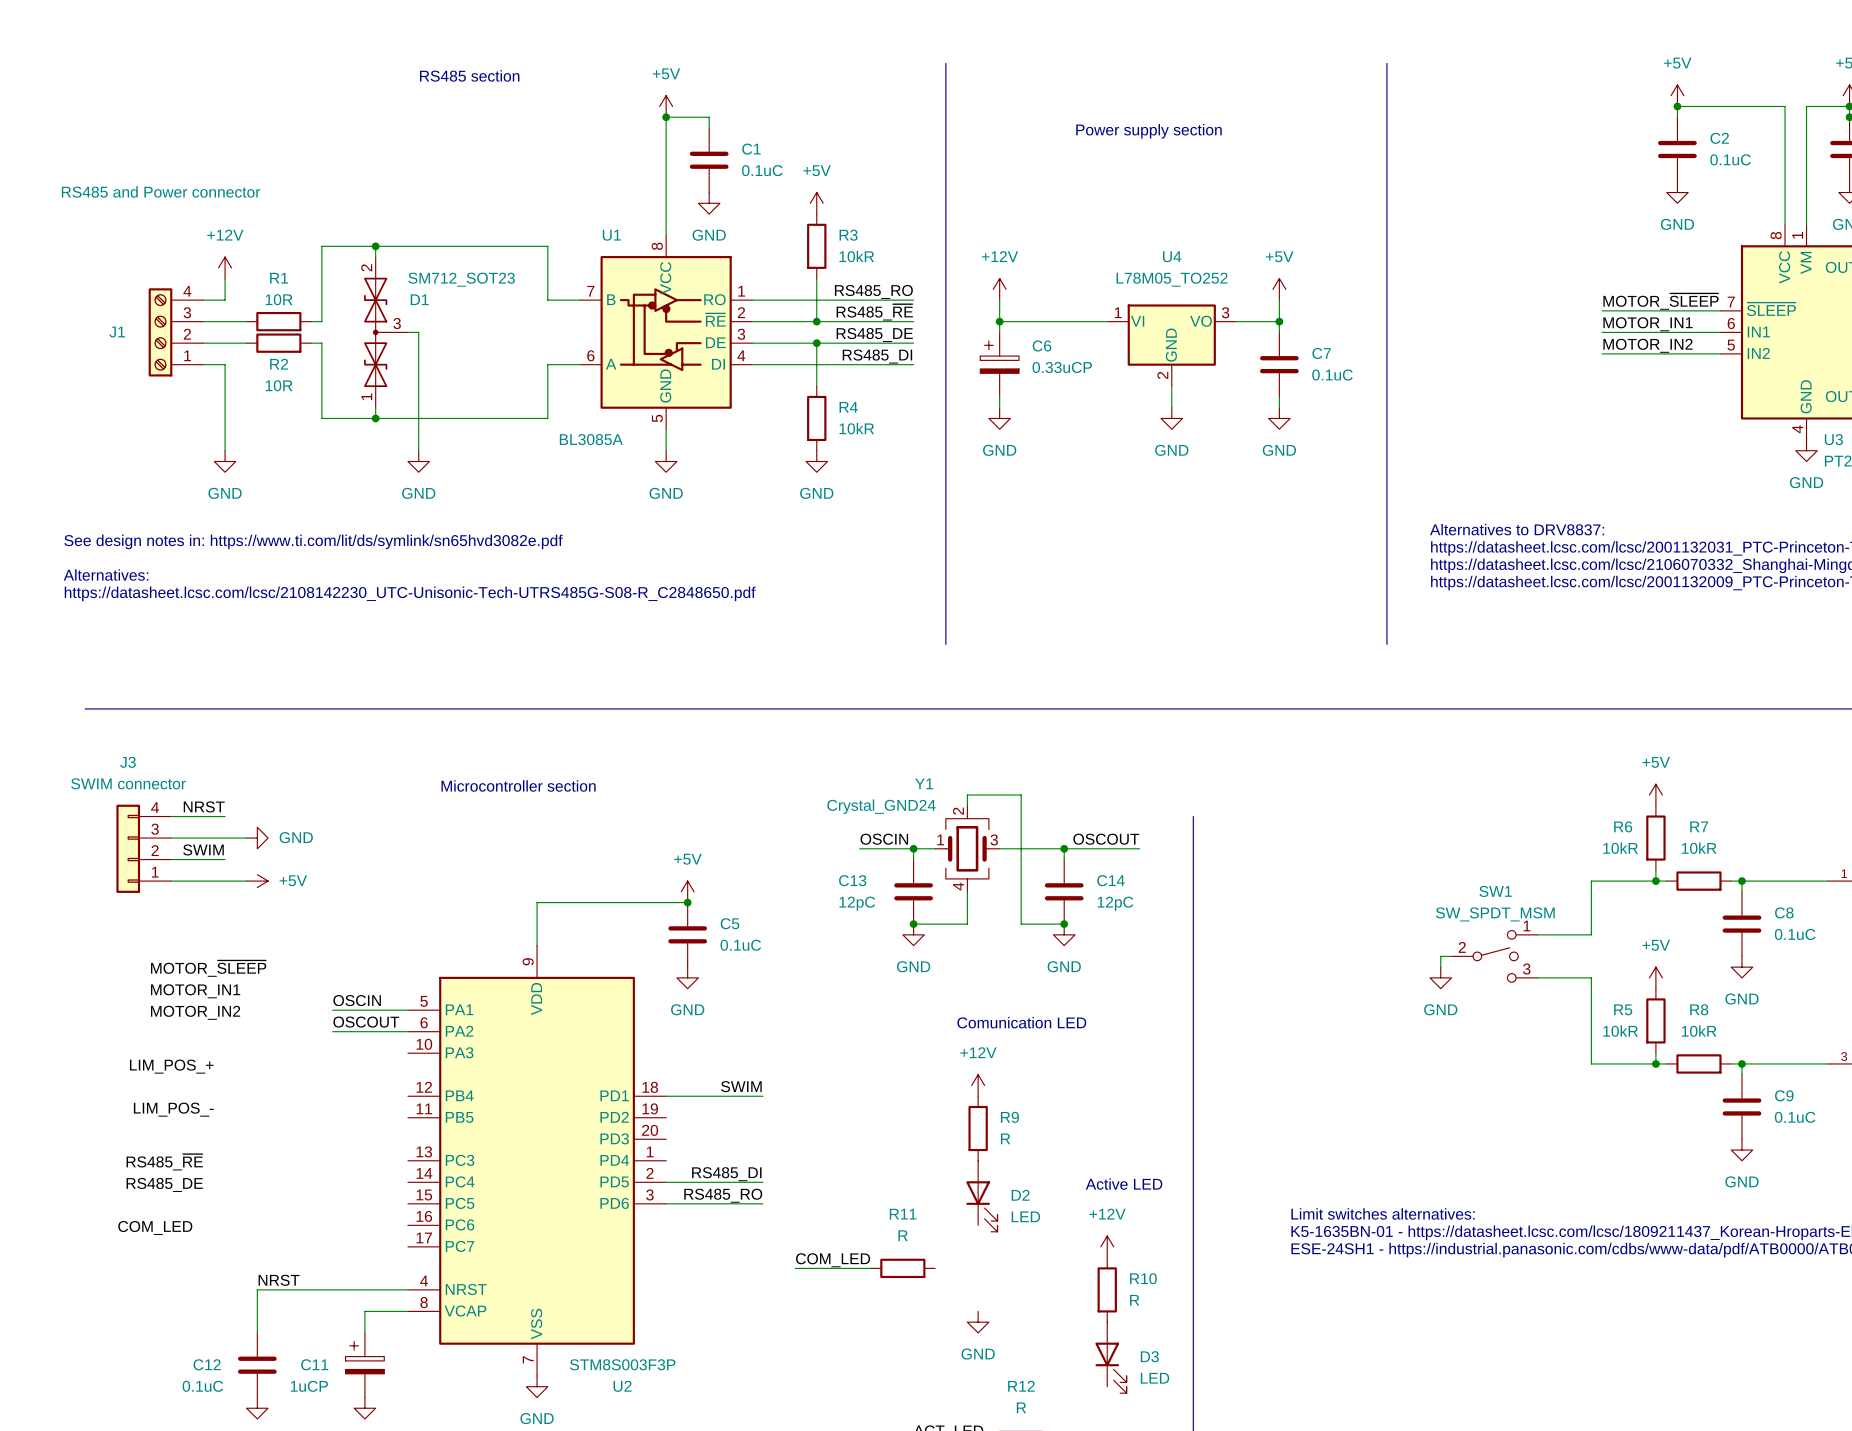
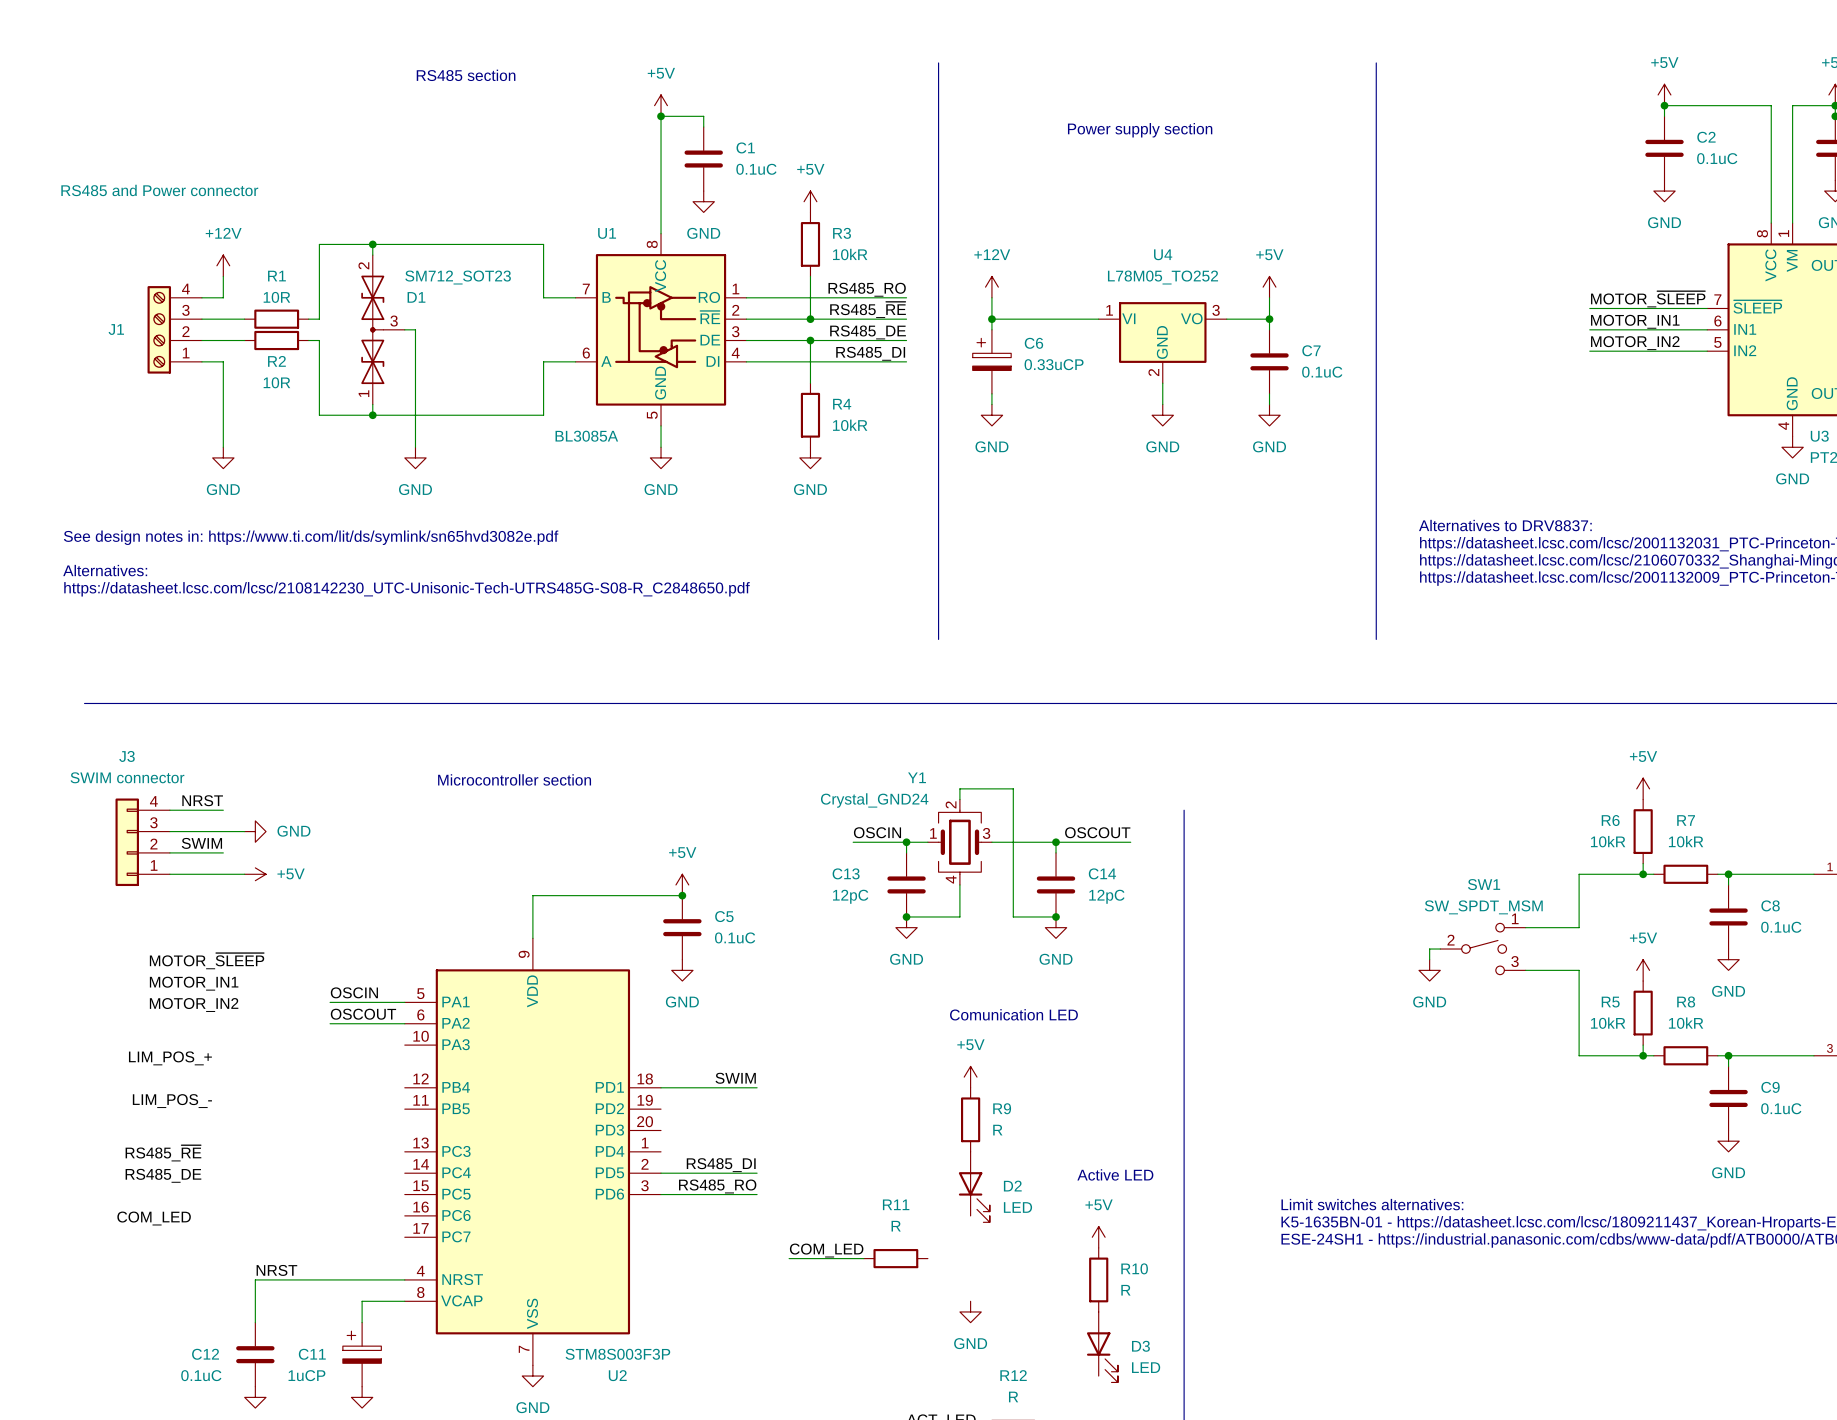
power symbol: +12V (978, 1085) -> +5V (970, 1077)
power symbol: +12V (1107, 1246) -> +5V (1098, 1237)

